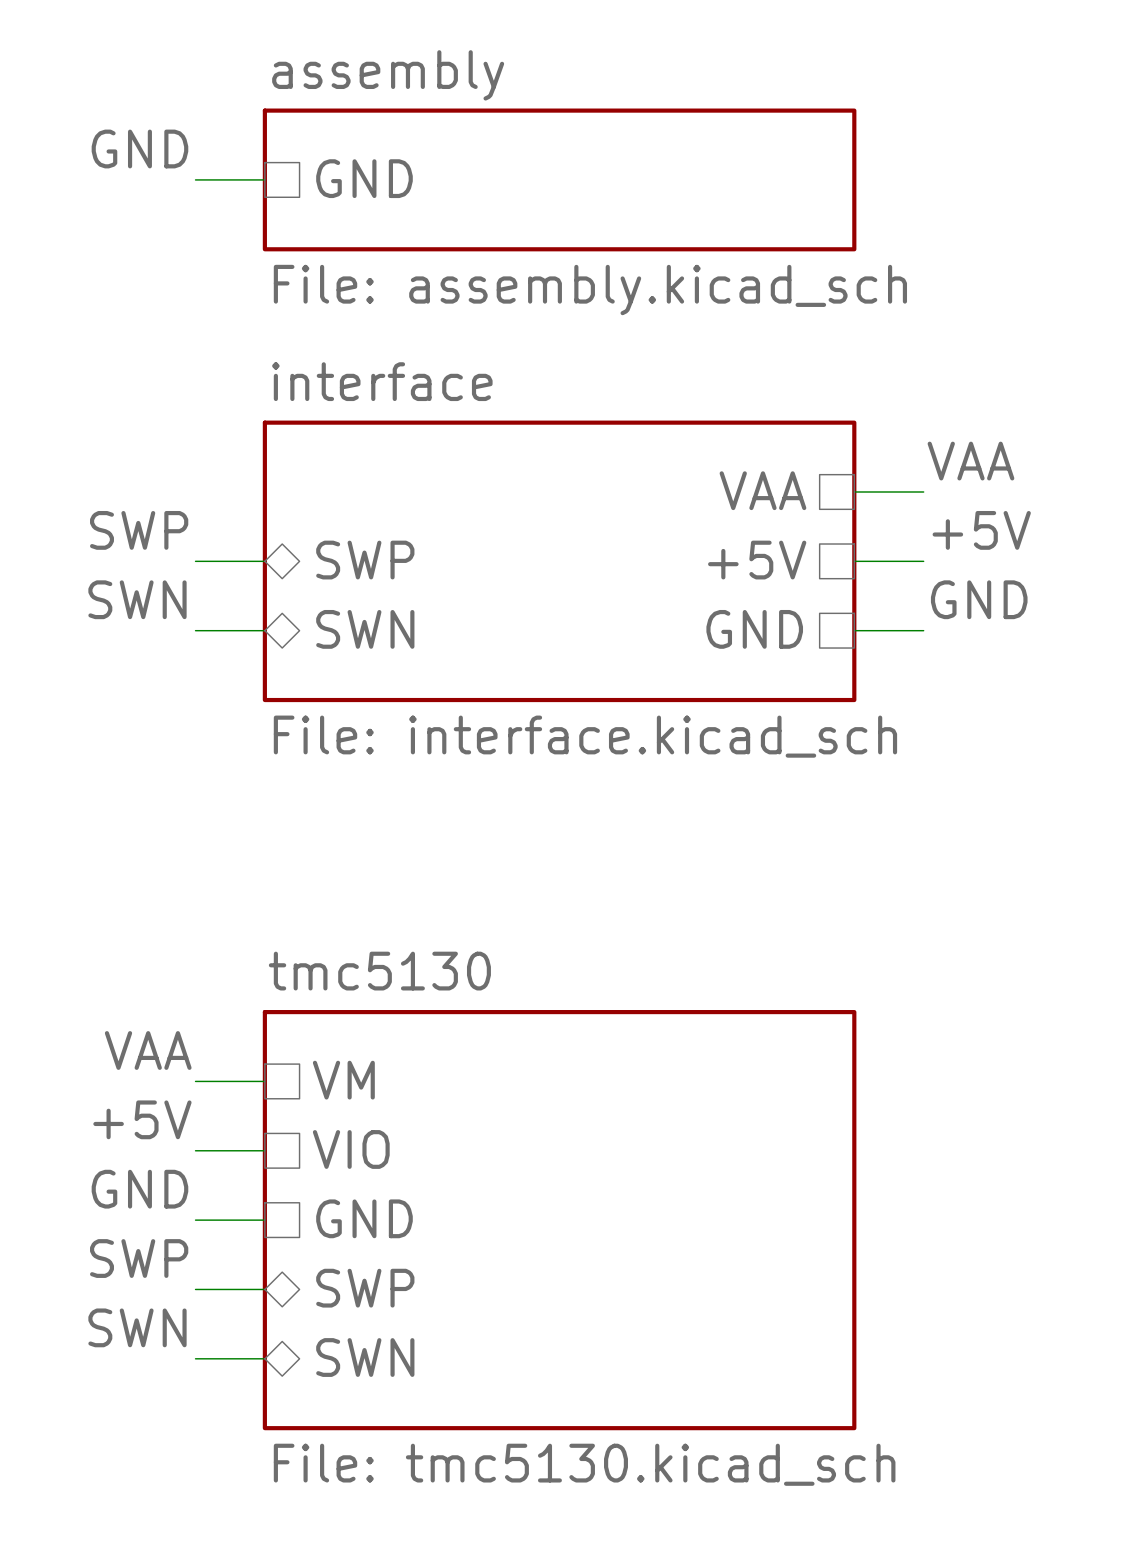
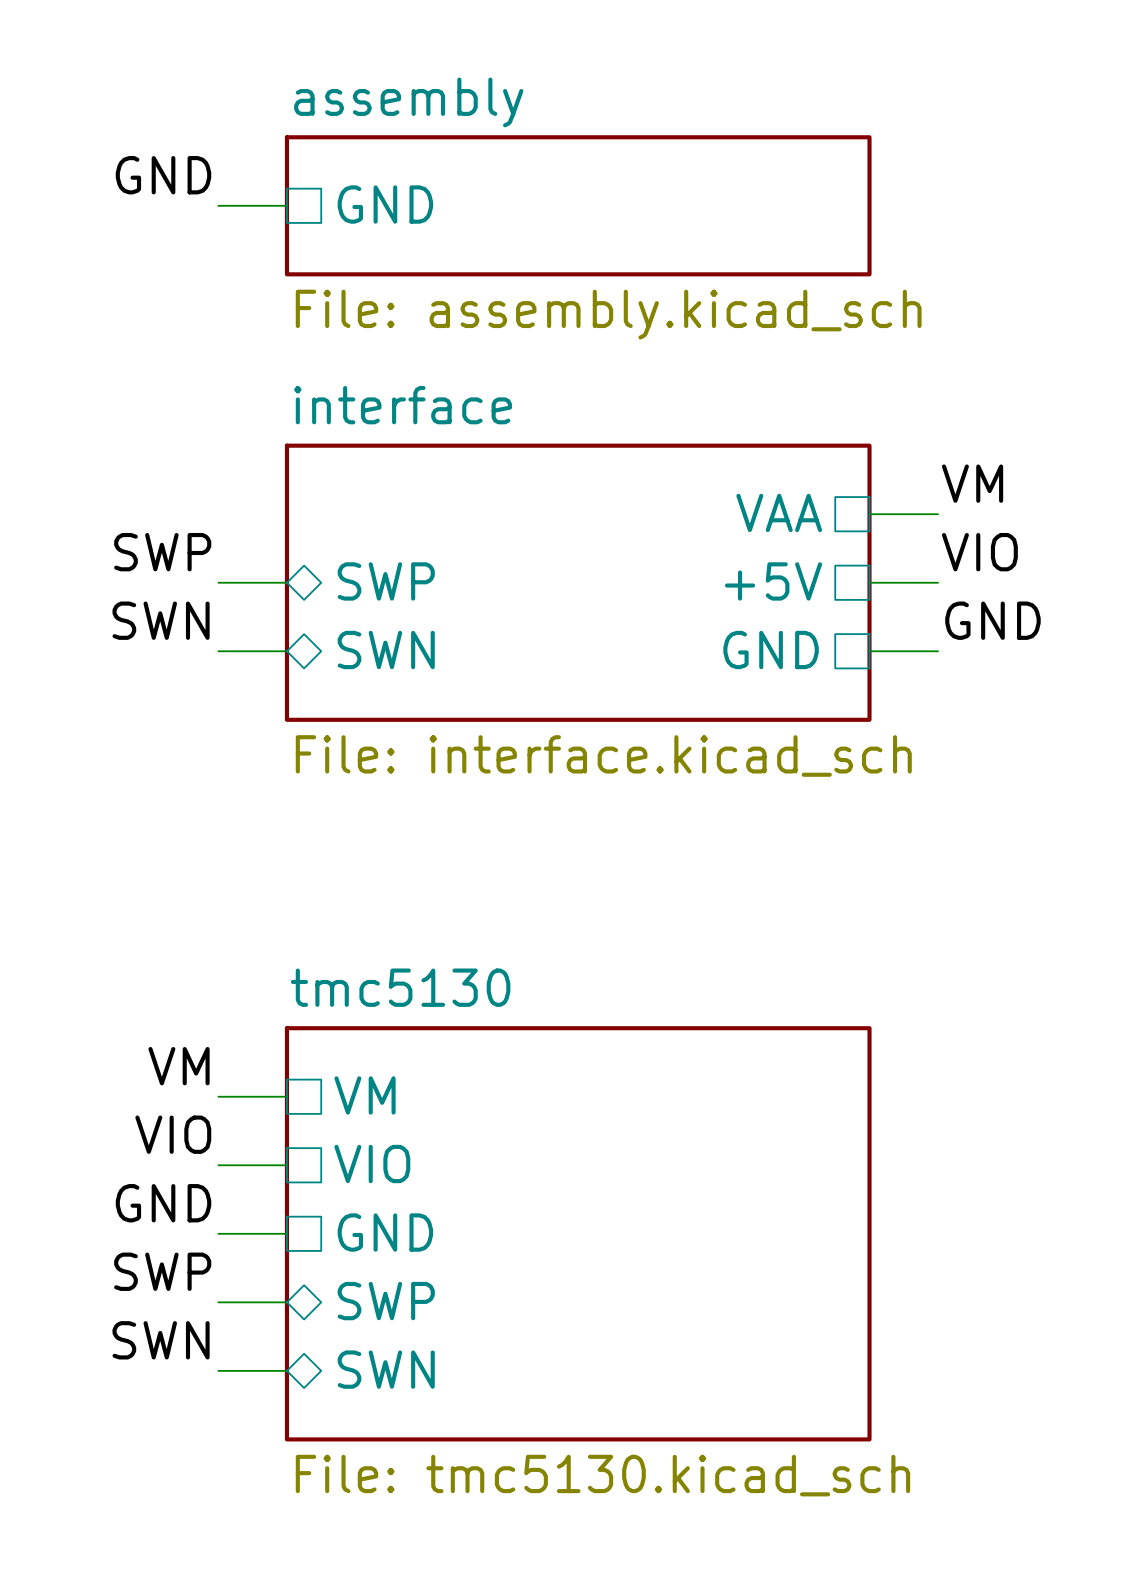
label: VAA (970, 461) -> VM (972, 483)
label: +5V (981, 530) -> VIO (979, 552)
label: VAA (148, 1050) -> VM (179, 1066)
label: +5V (142, 1119) -> VIO (173, 1134)

